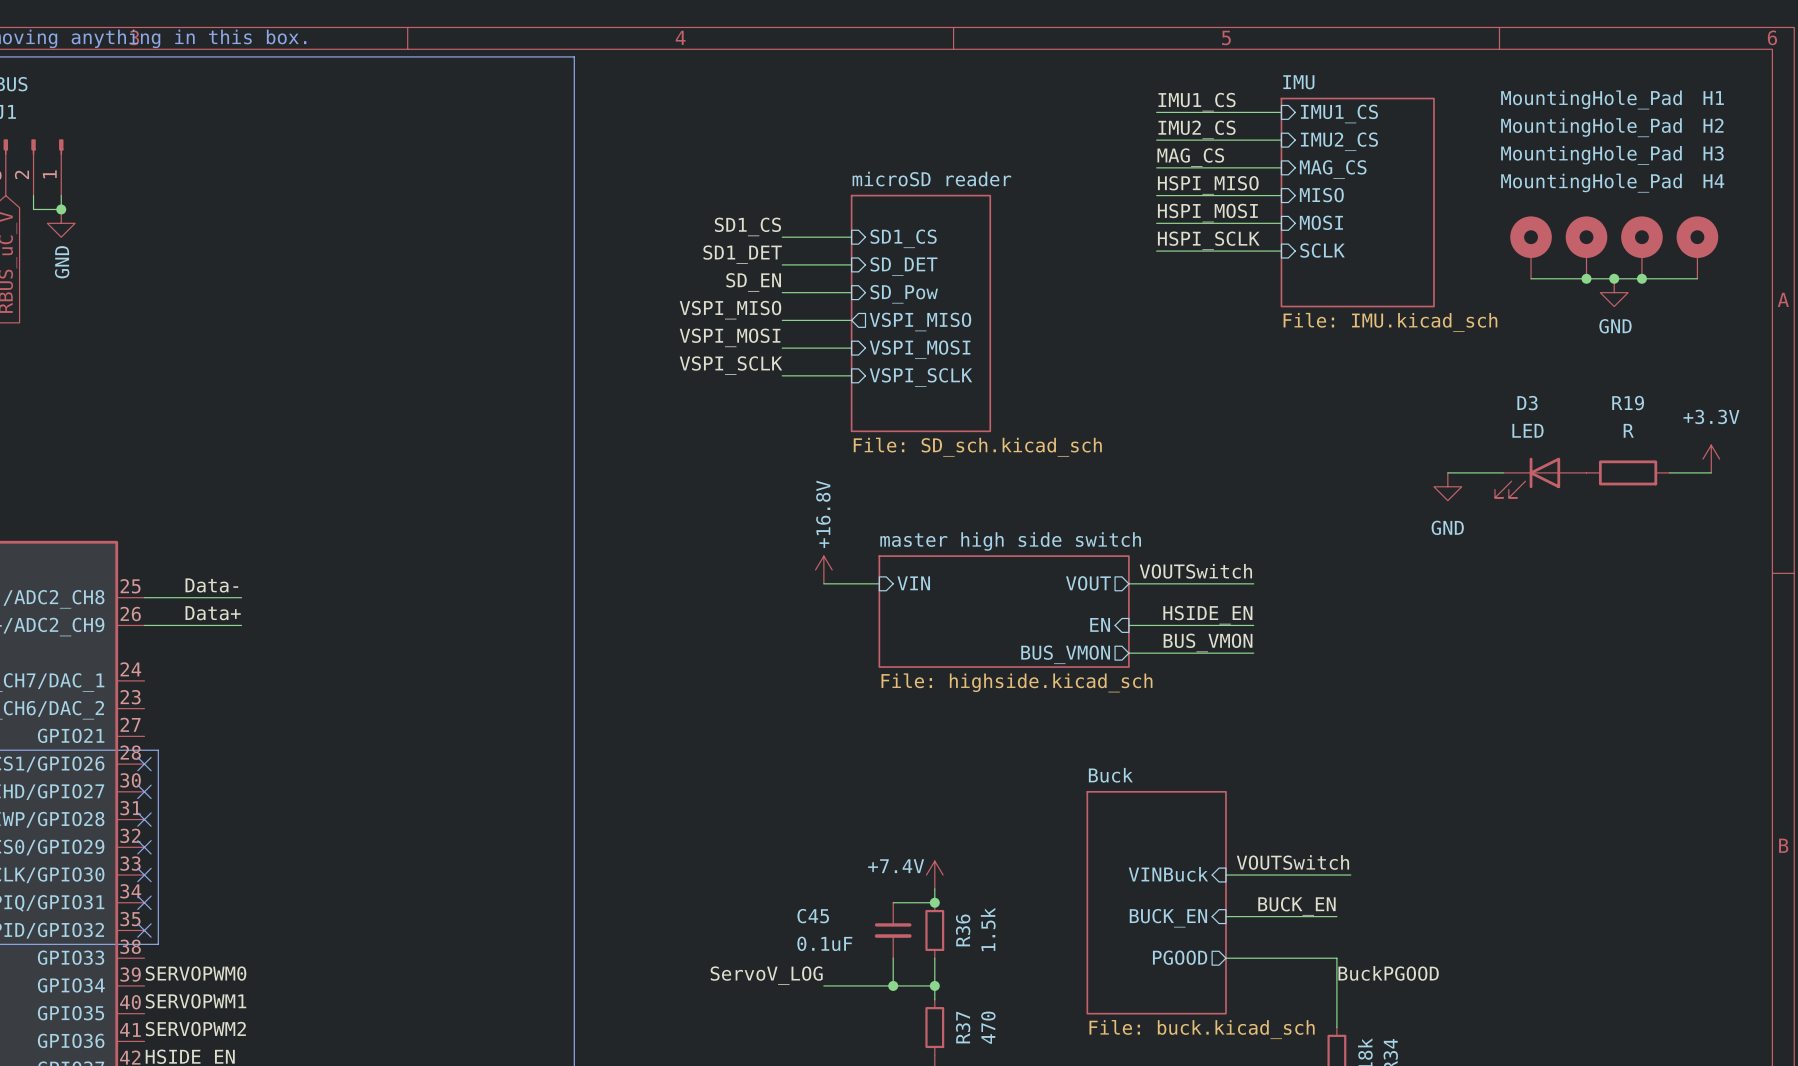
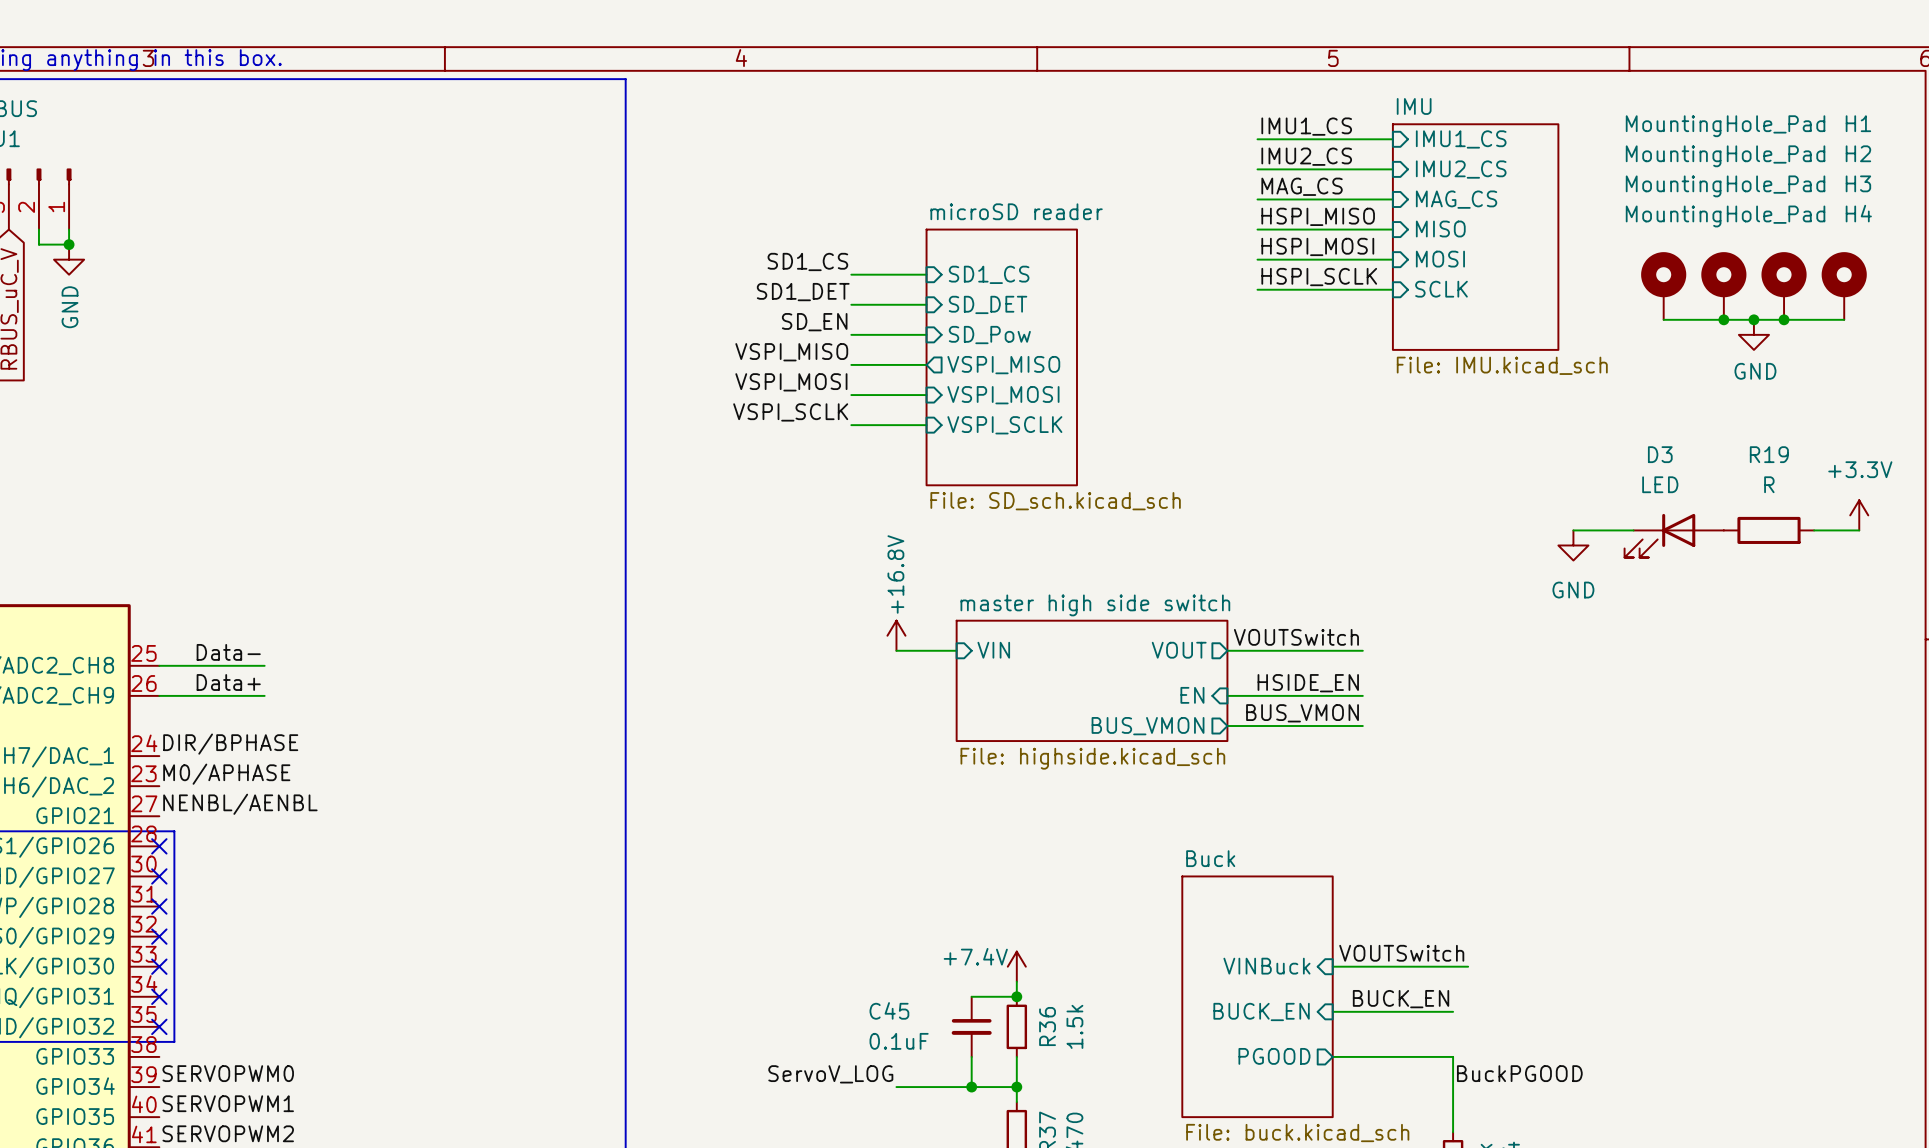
label: none -> DIR/BPHASE (230, 744)
label: none -> M0/APHASE (226, 774)
label: none -> NENBL/AENBL (240, 804)

